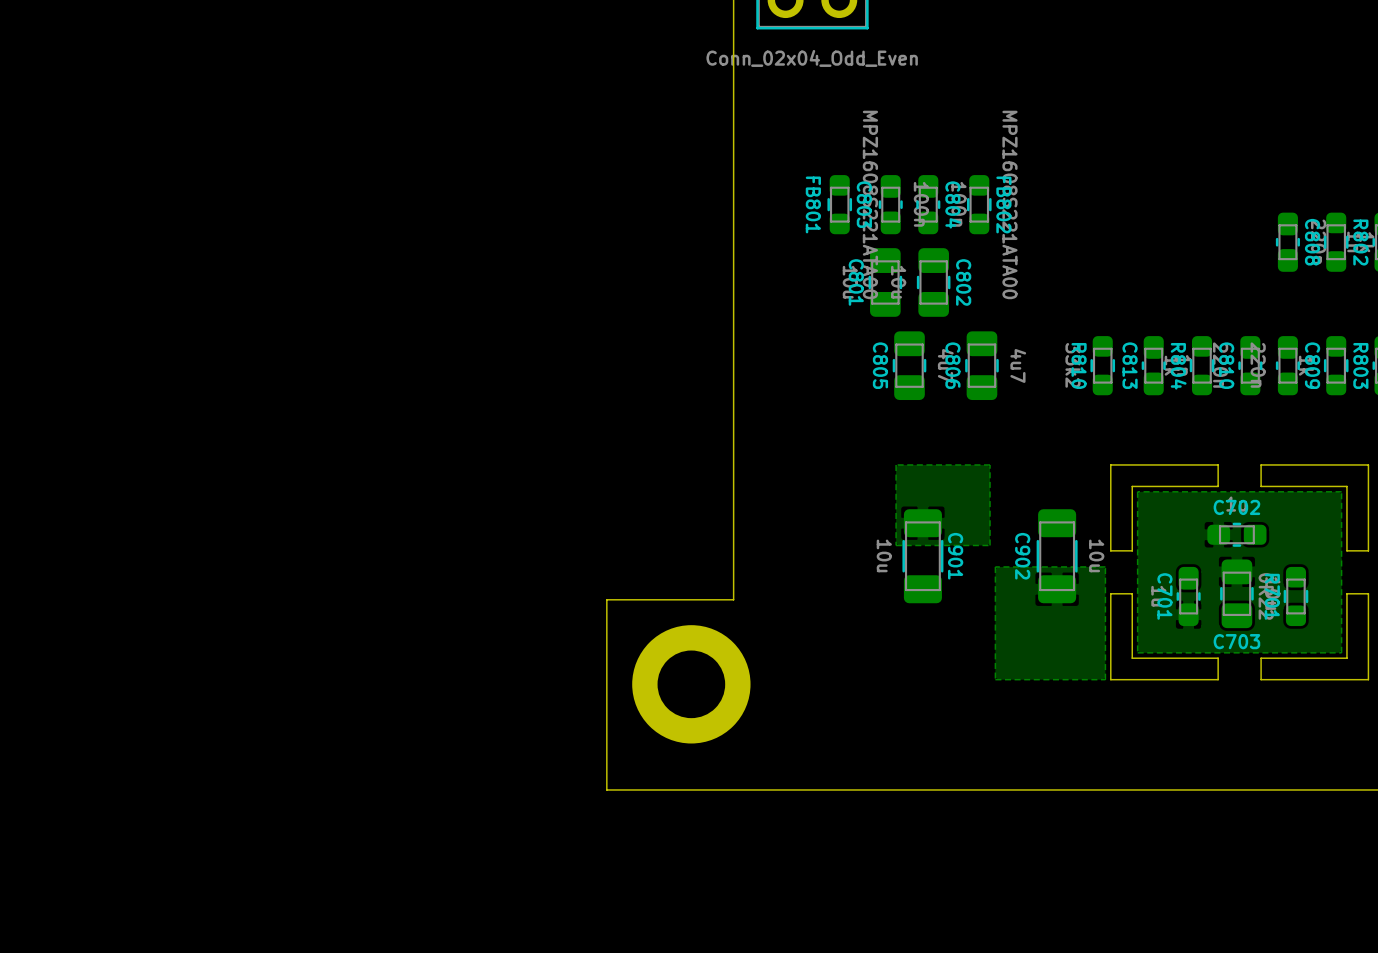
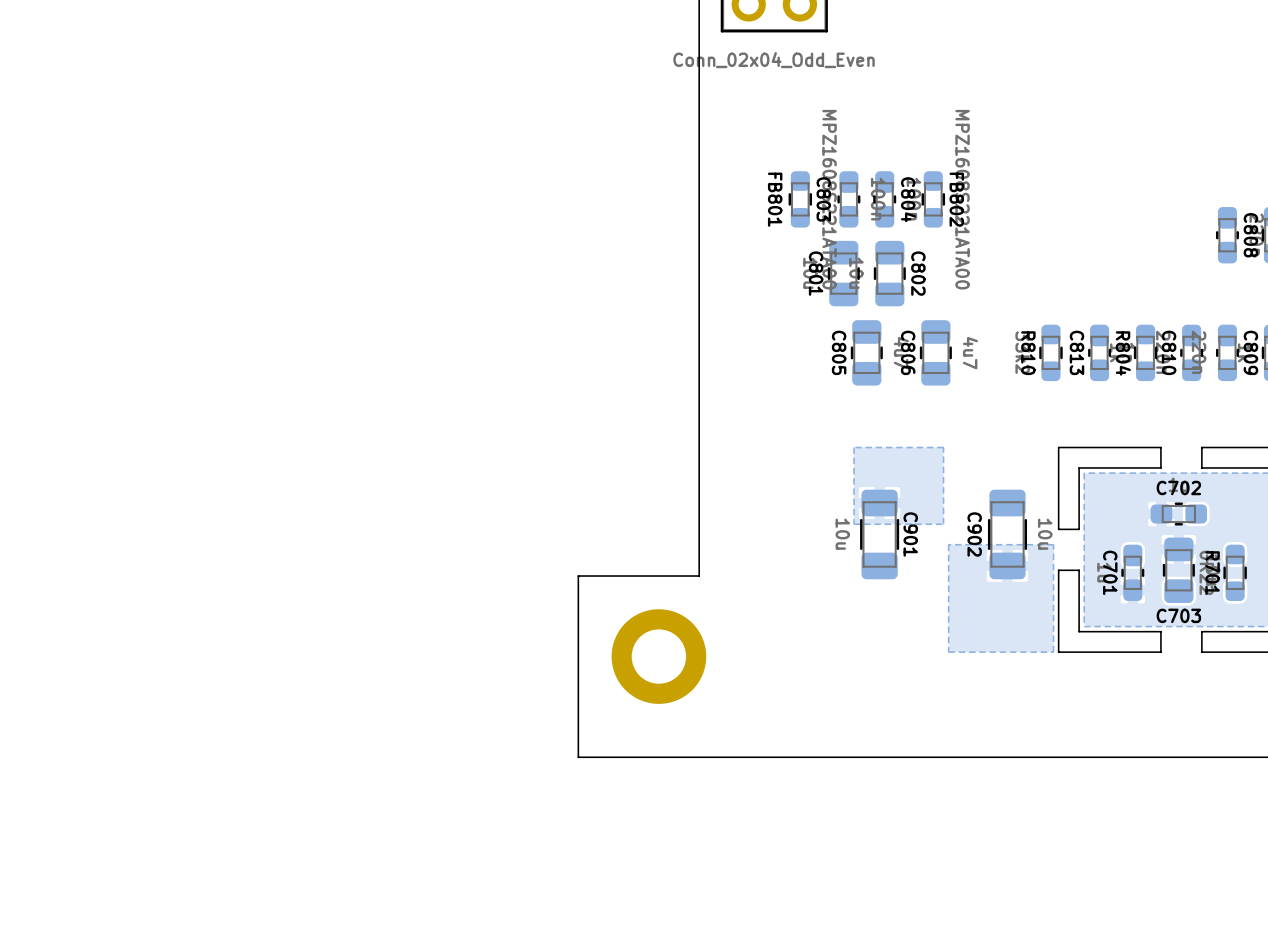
part footprint: [632, 625, 751, 744] -> [611, 609, 707, 704]

